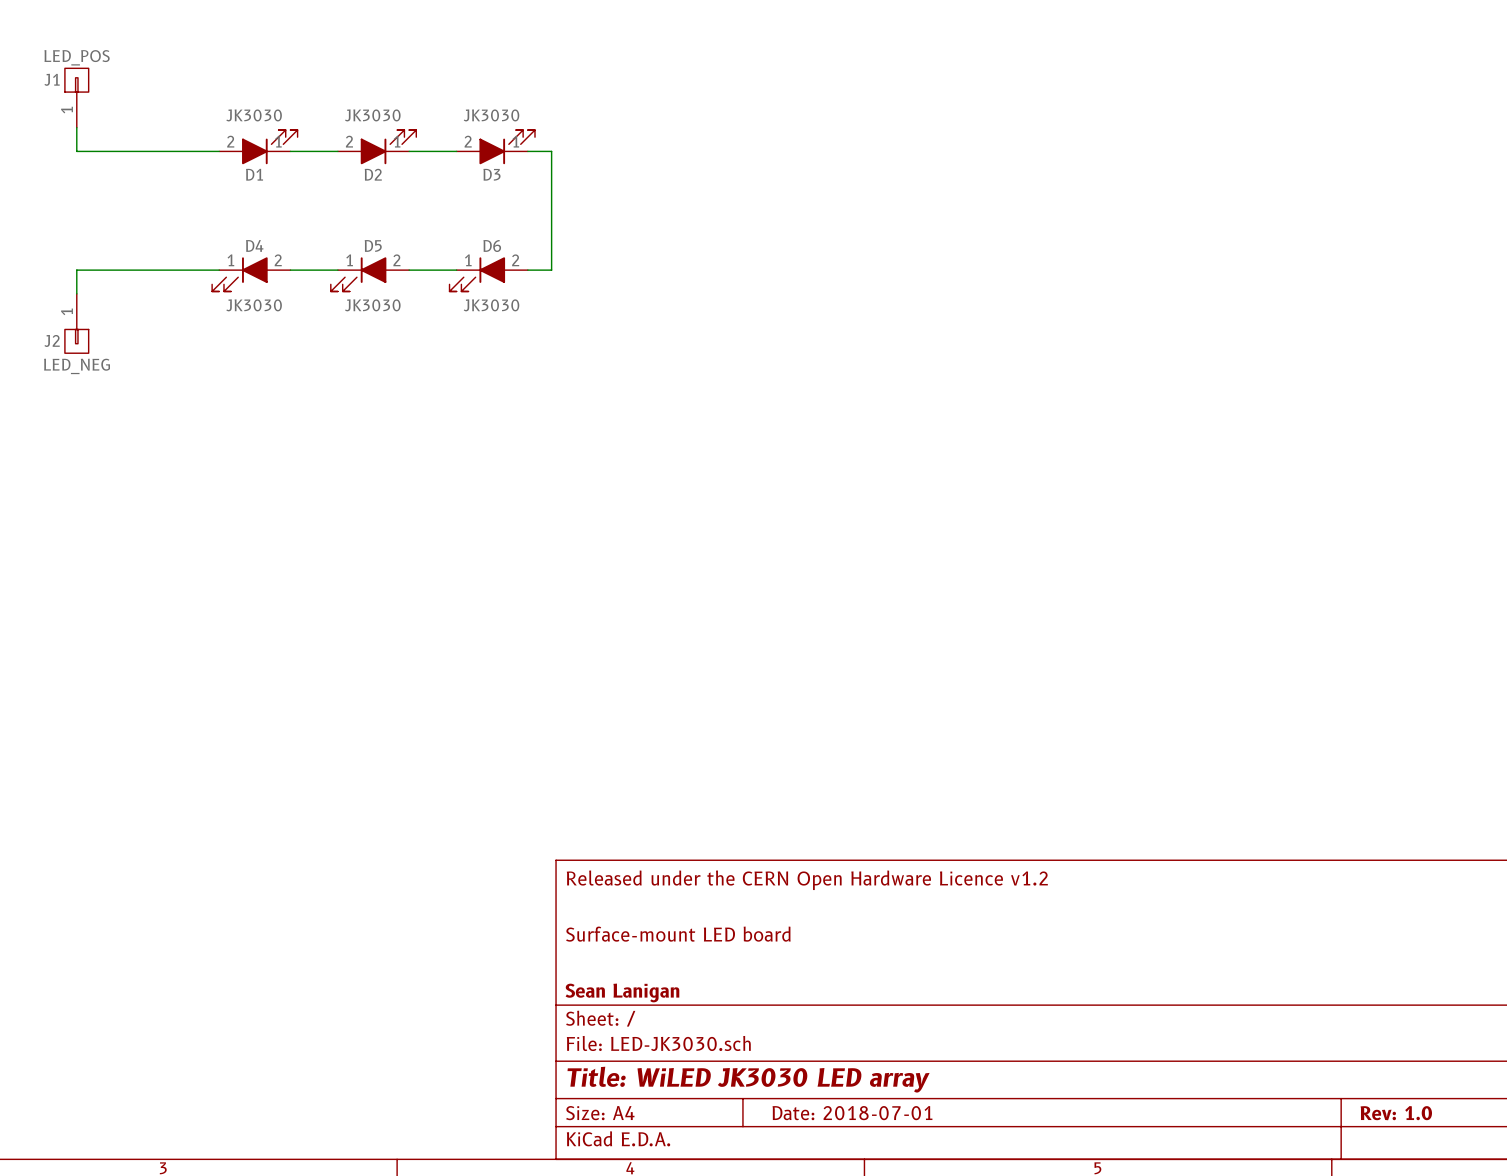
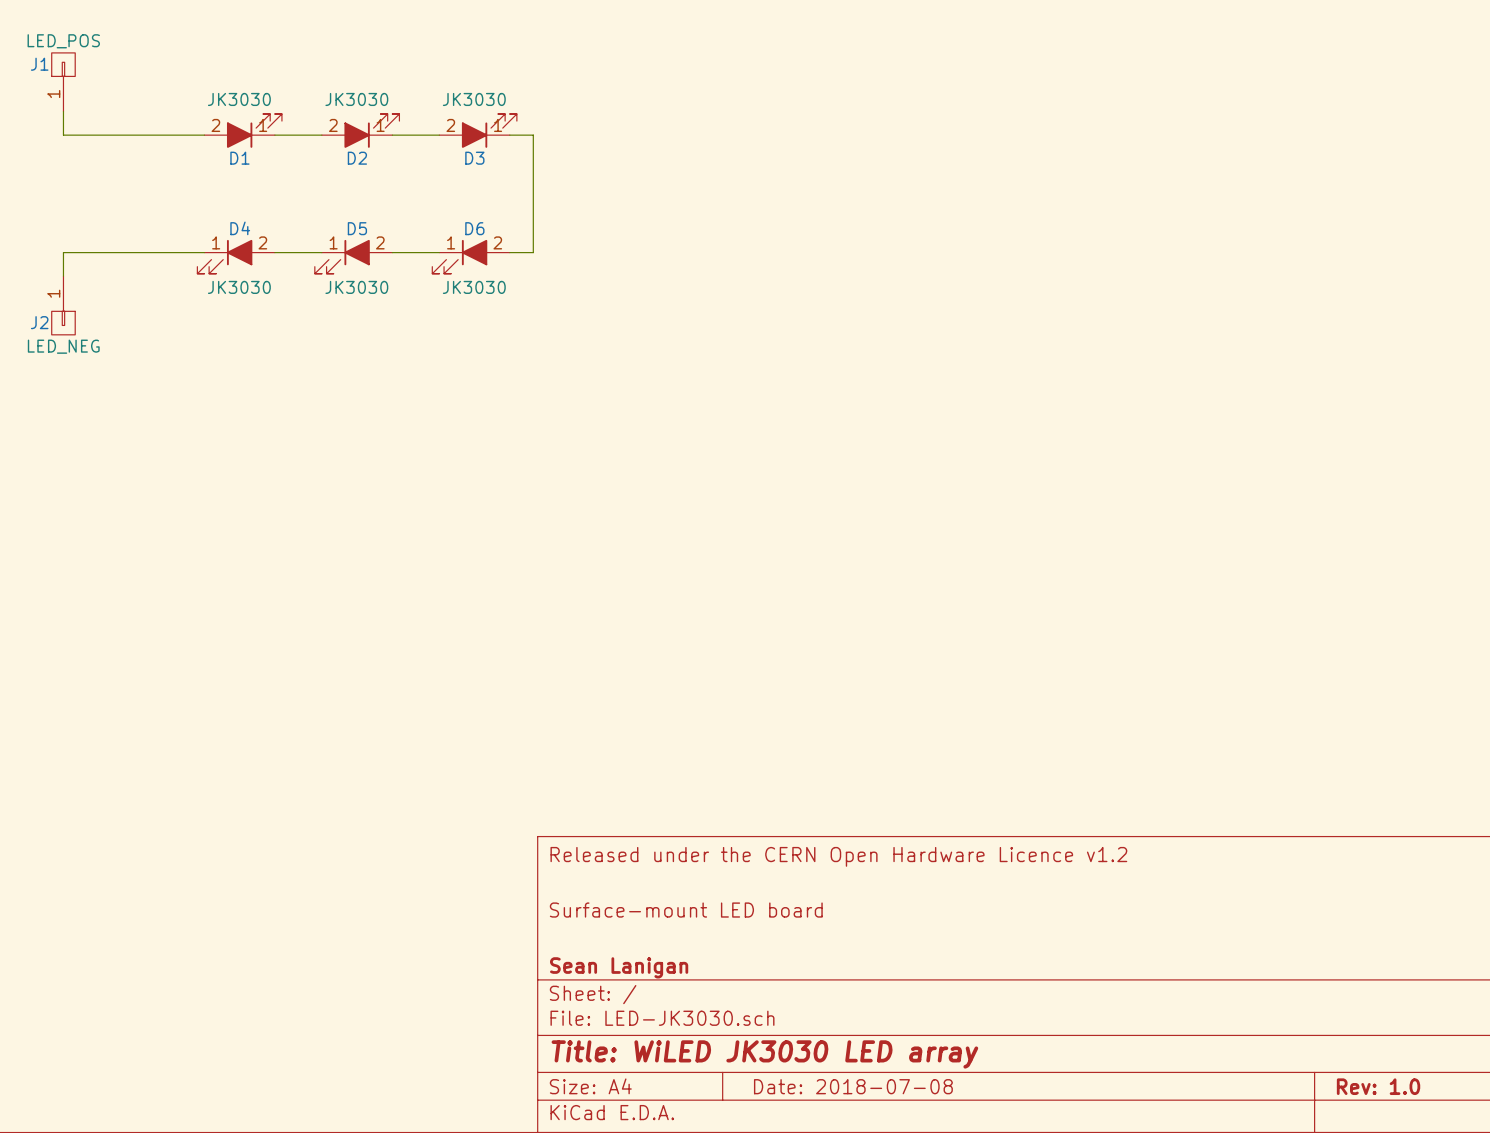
title block: Date: 2018-07-01 (852, 1113) -> Date: 2018-07-08 (853, 1086)

